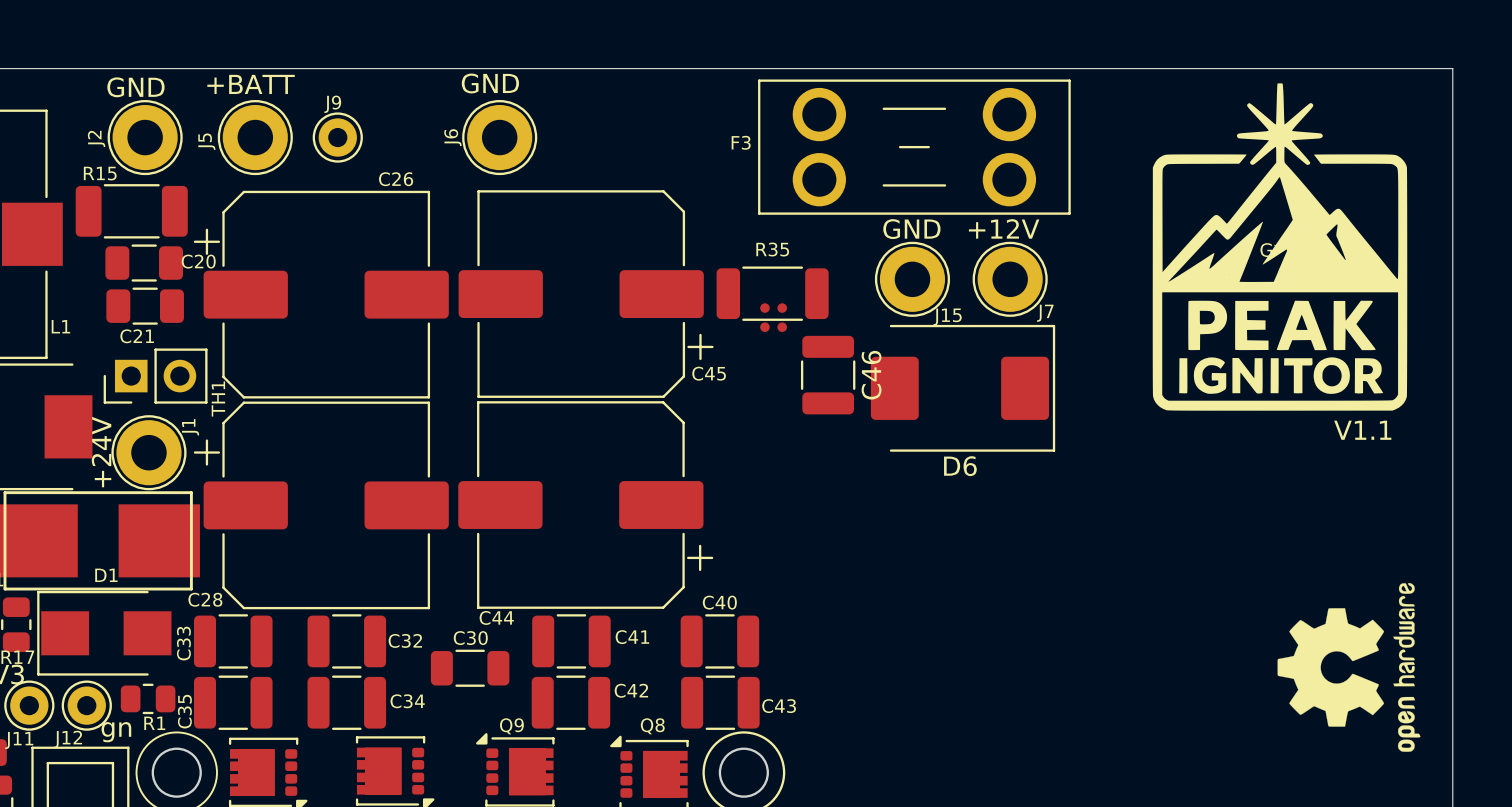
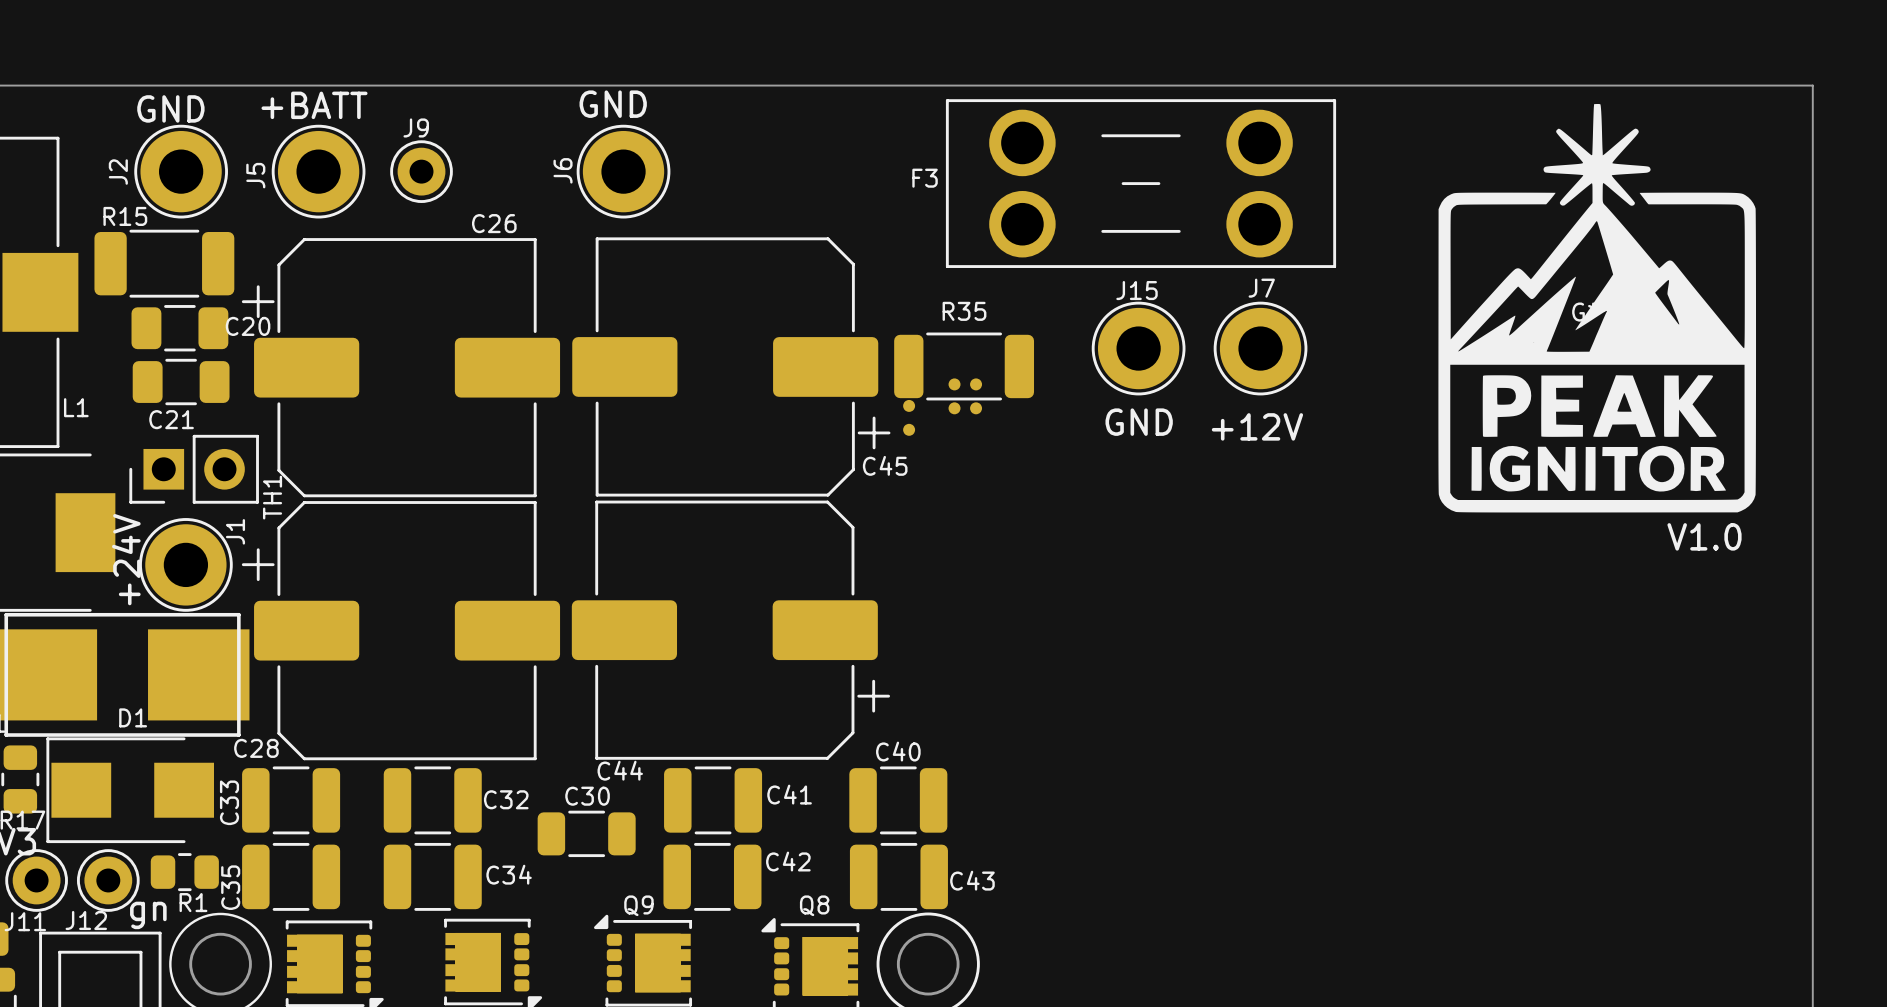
text position: +12V (1004, 228) -> +12V (1257, 426)
text position: GND (911, 229) -> GND (1139, 422)
J7 name position: J7 (1045, 313) -> J7 (1261, 288)
J15 name position: J15 (947, 317) -> J15 (1137, 290)
part: none -> (909, 417)
C46: (828, 375) -> none
D6: (963, 388) -> none
text: V1.1 (1362, 430) -> V1.0 (1704, 536)
drawing: [1277, 583, 1421, 752] -> none

